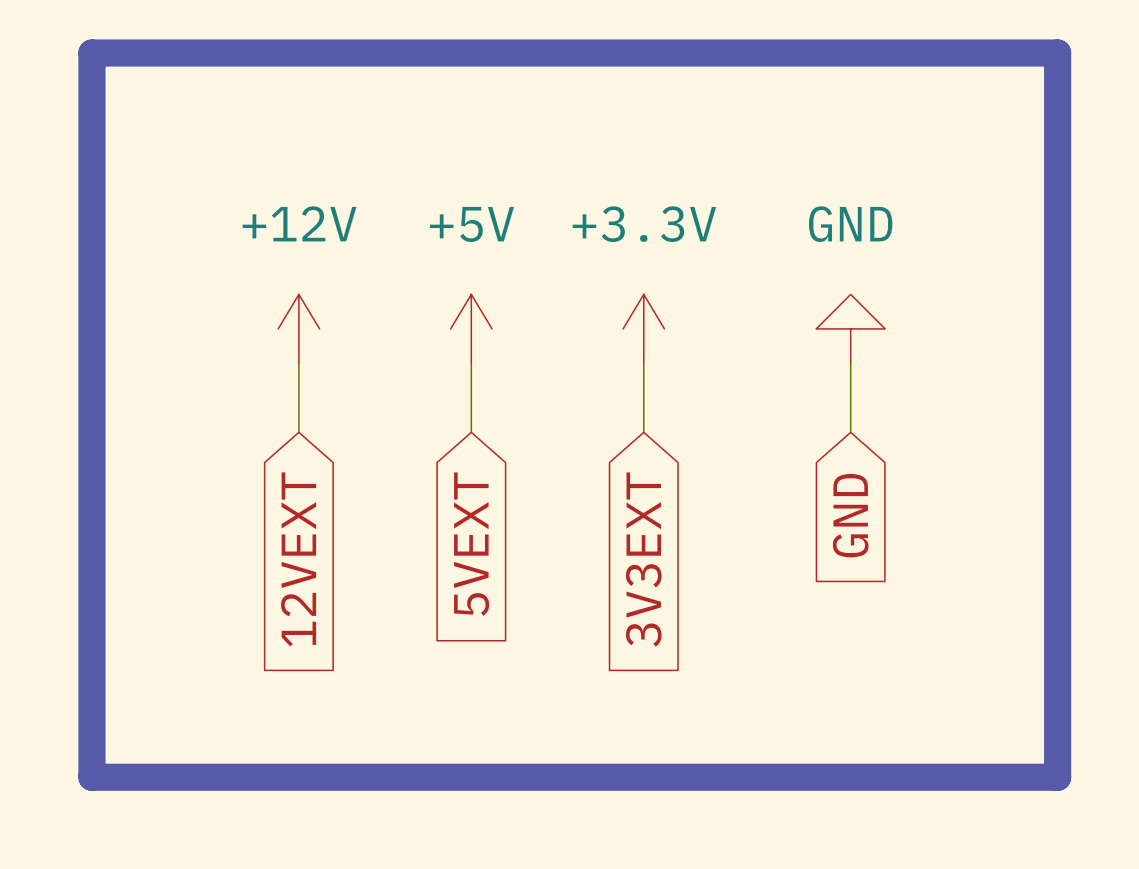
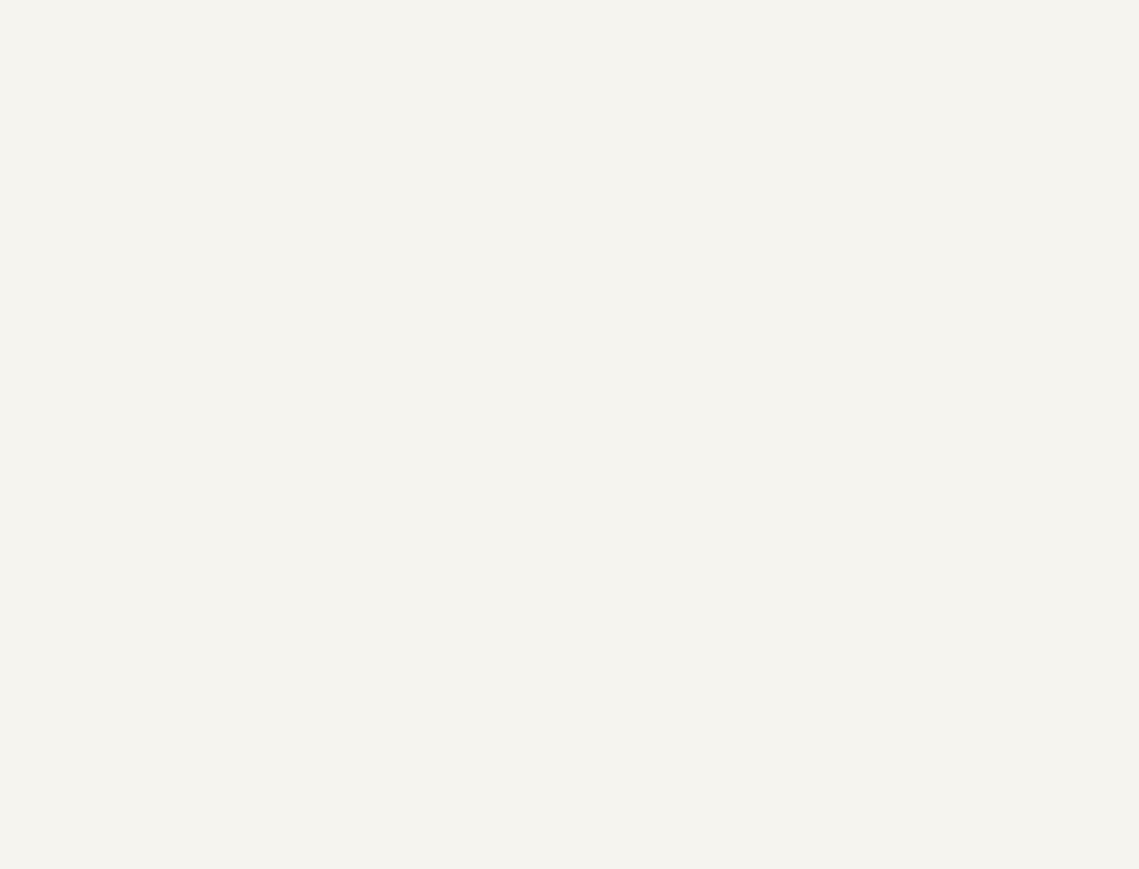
line: (91, 53) (1057, 53) (1057, 777) (91, 777) (91, 53) -> none
power symbol: +12V (298, 328) -> none
power symbol: +5V (471, 328) -> none
power symbol: +3.3V (643, 328) -> none
power symbol: GND (850, 328) -> none
wire: (298, 363) (298, 432) -> none
wire: (471, 363) (471, 432) -> none
wire: (643, 363) (643, 432) -> none
wire: (850, 363) (850, 432) -> none
global label: GND (850, 515) -> none
global label: 5VEXT (471, 544) -> none
global label: 12VEXT (298, 559) -> none
global label: 3V3EXT (643, 559) -> none

